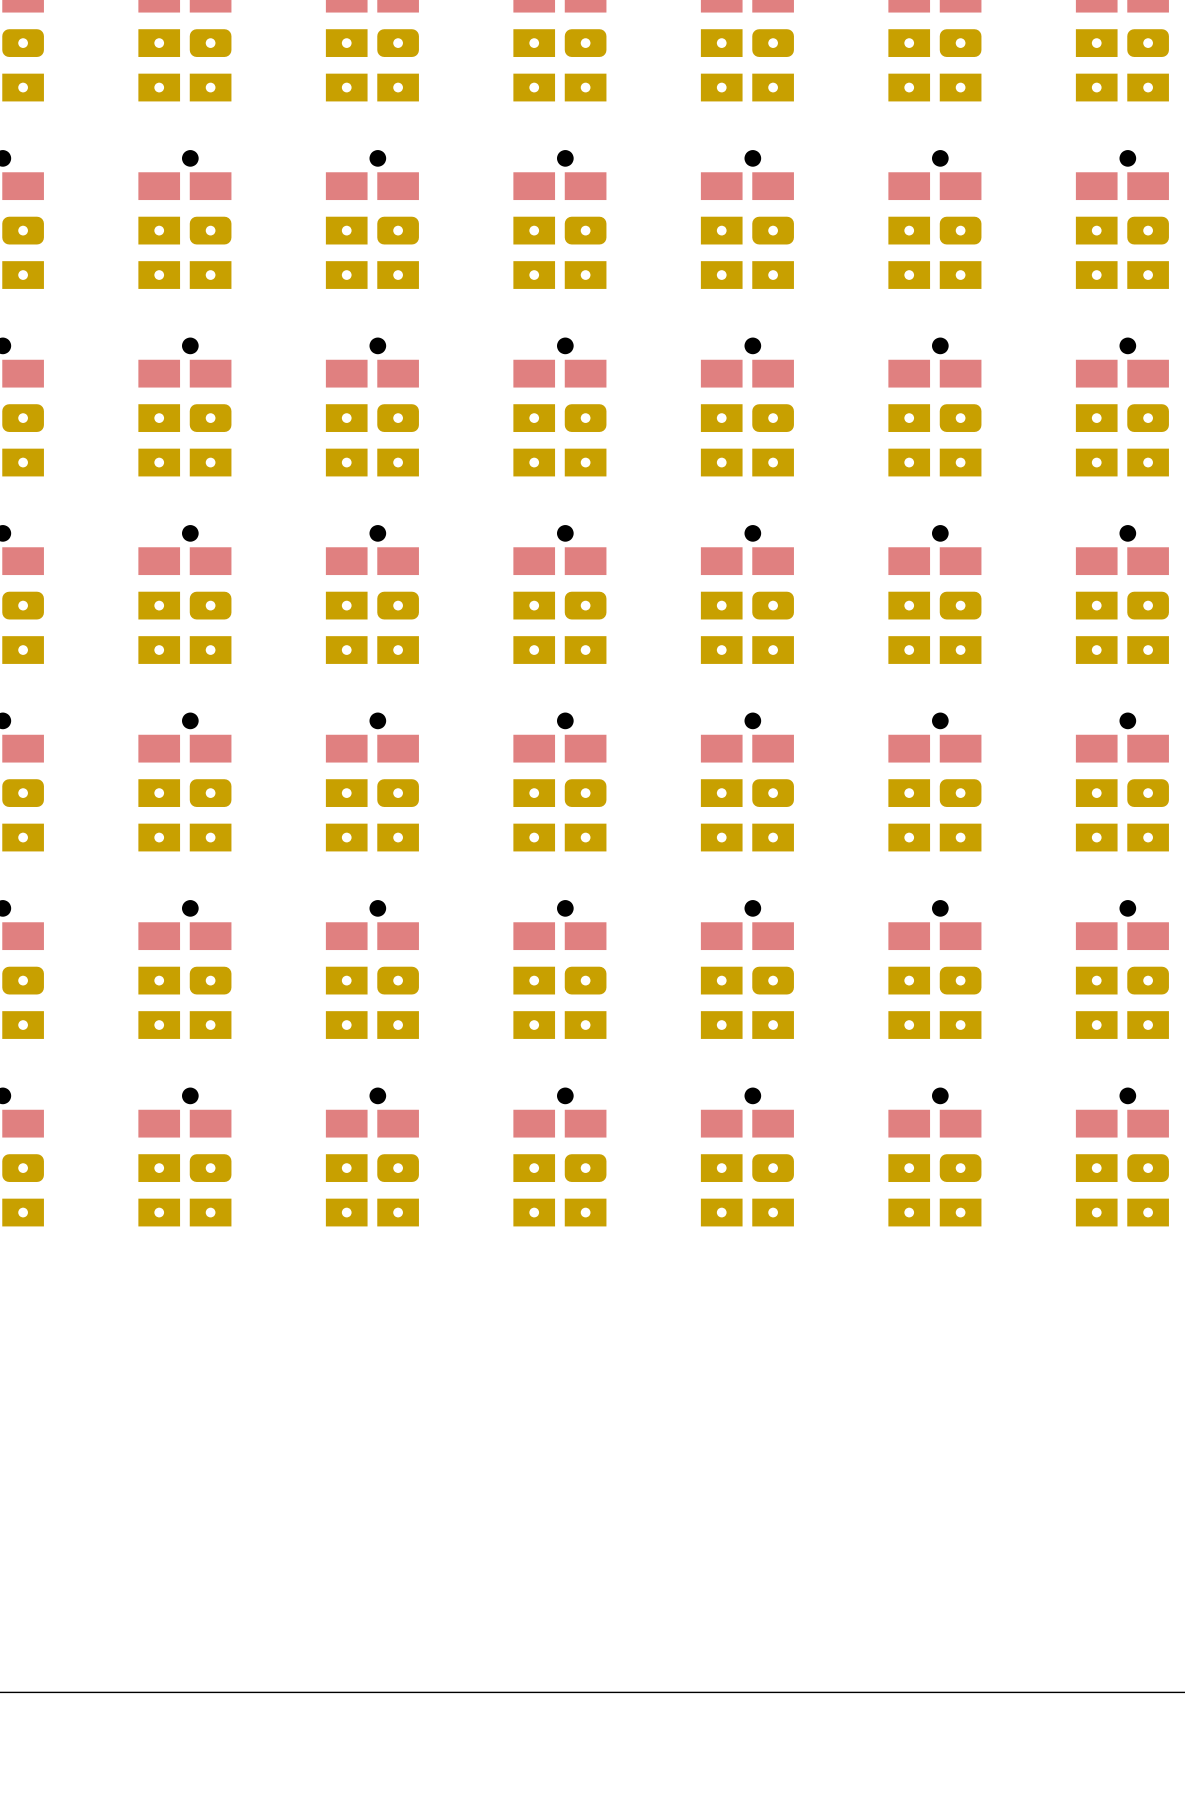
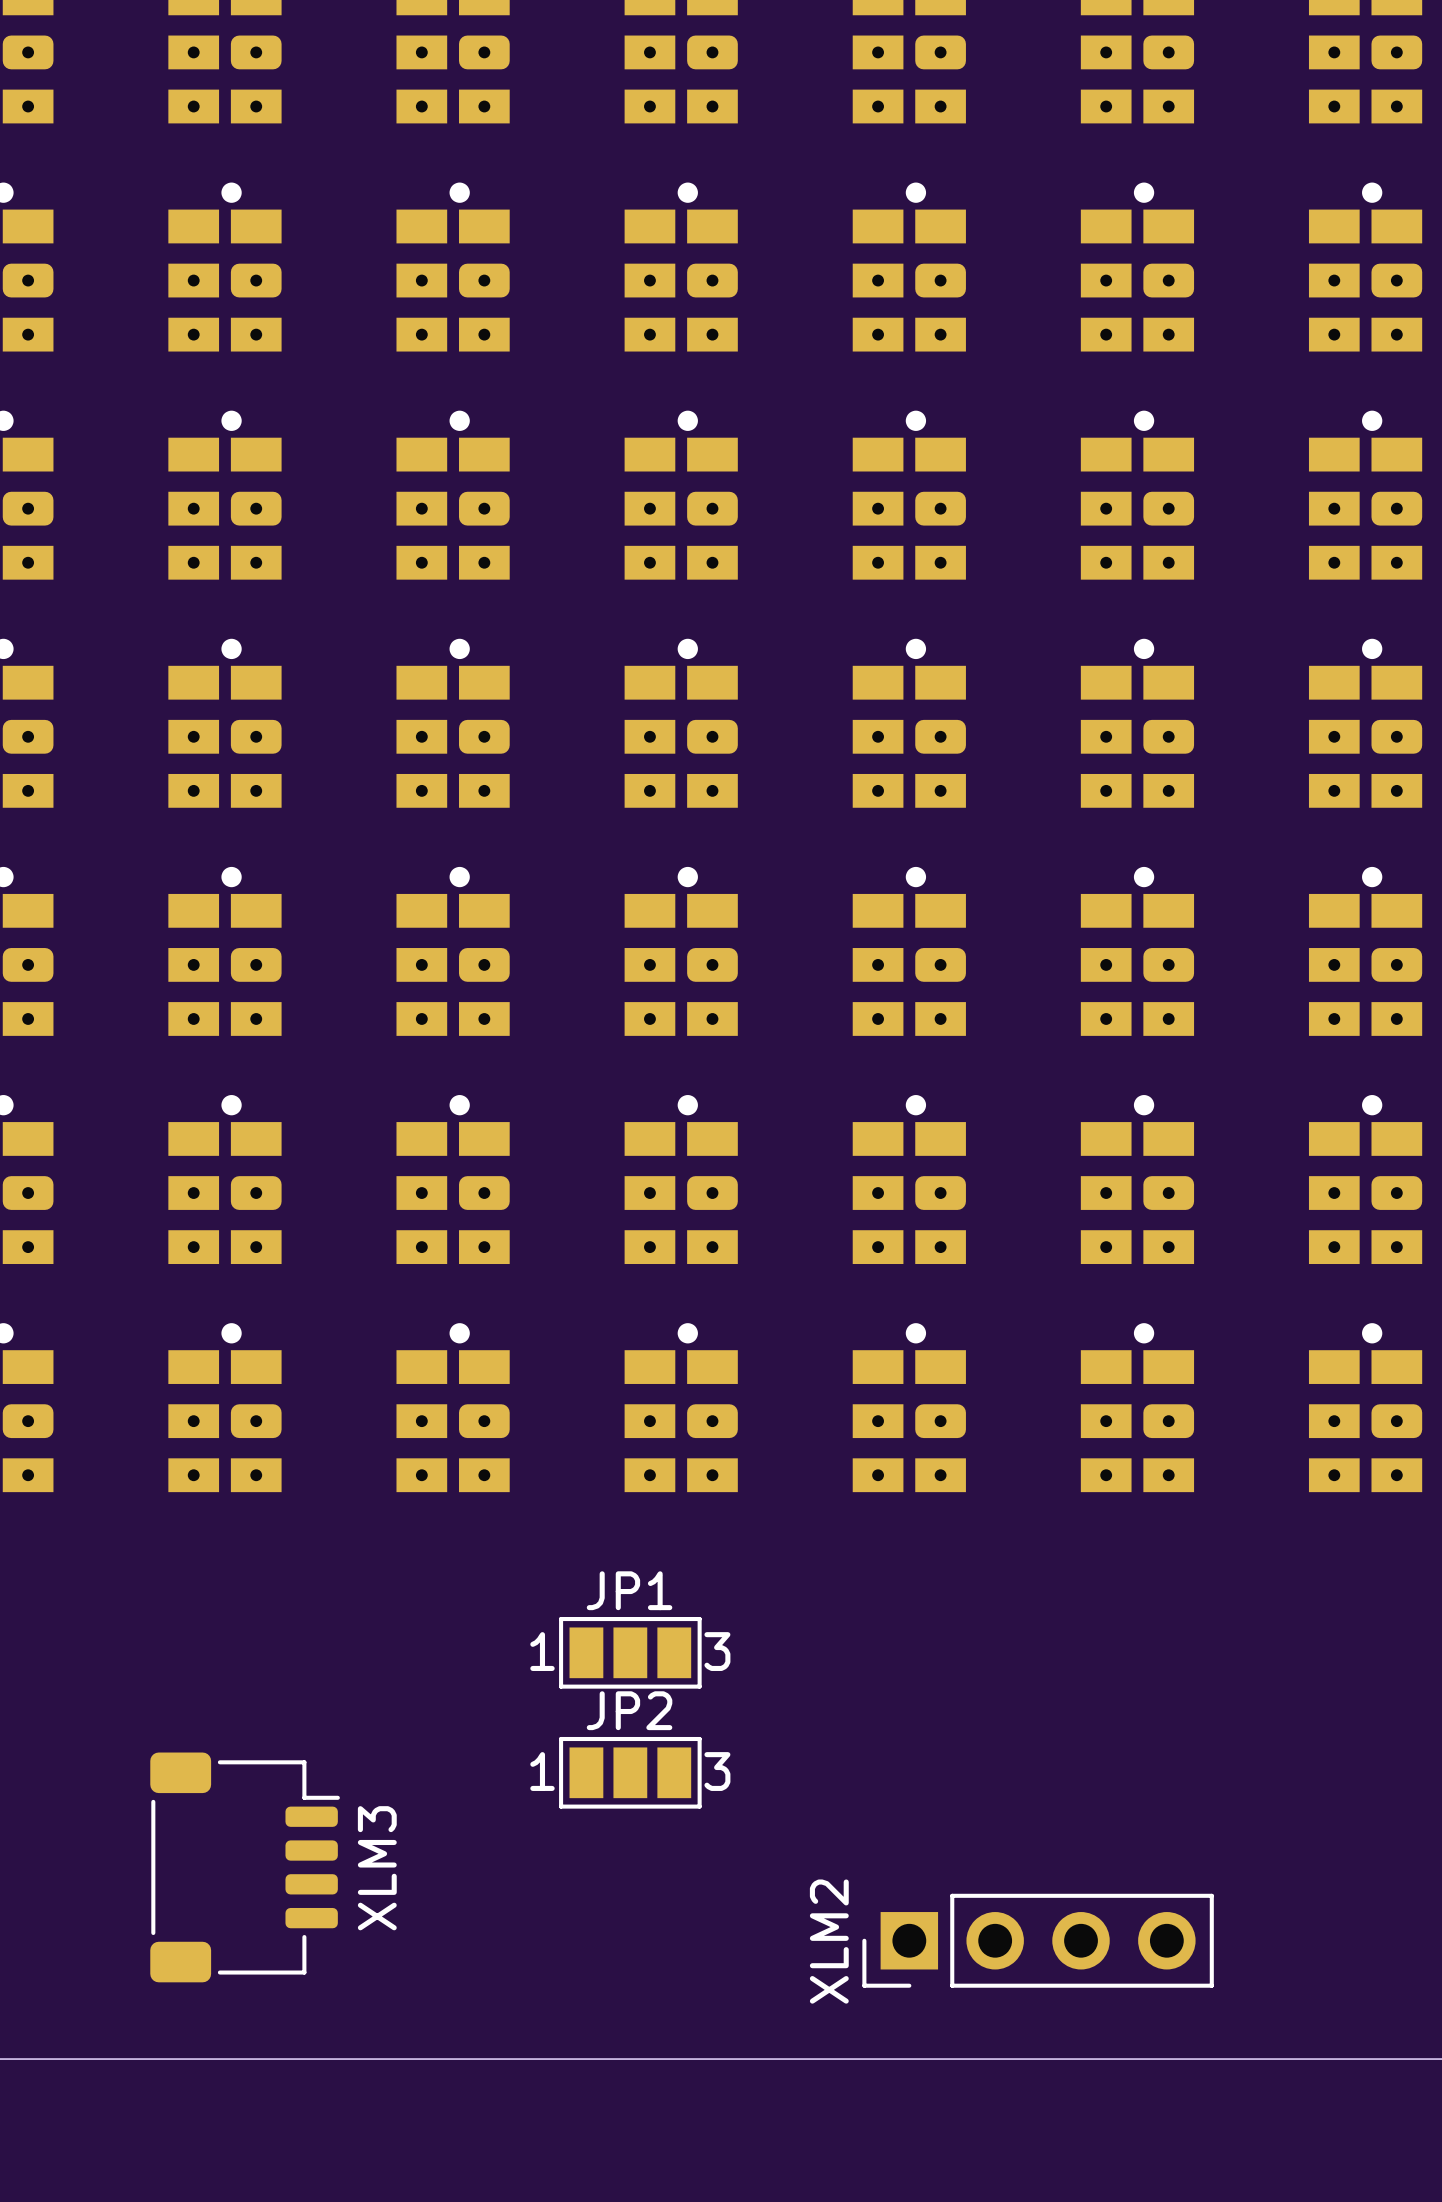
JP1: none -> (630, 1652)
JP2: none -> (630, 1772)
XLM3: none -> (245, 1867)
XLM2: none -> (1038, 1940)

